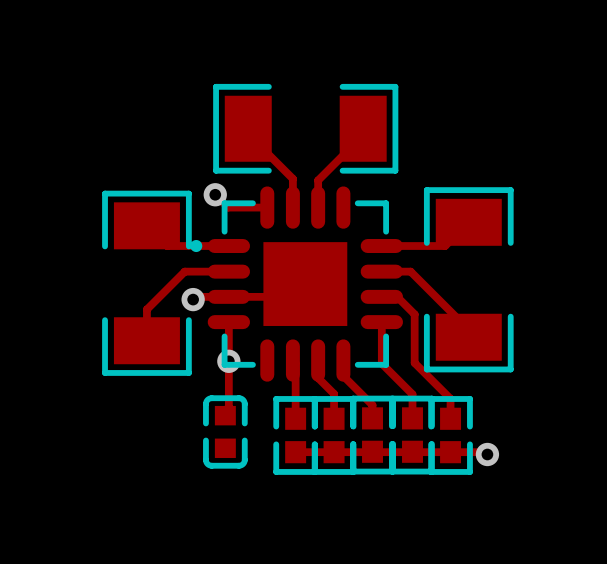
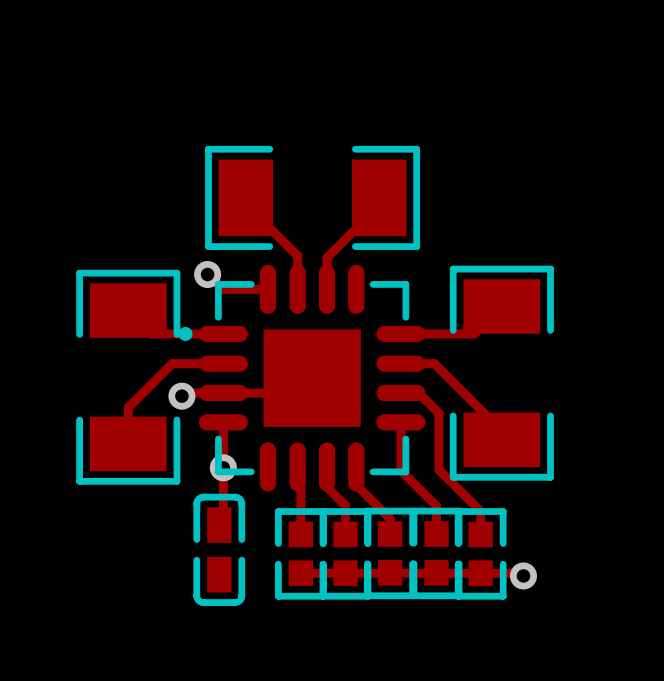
part footprint: [203, 395, 248, 469] -> [193, 493, 246, 606]

